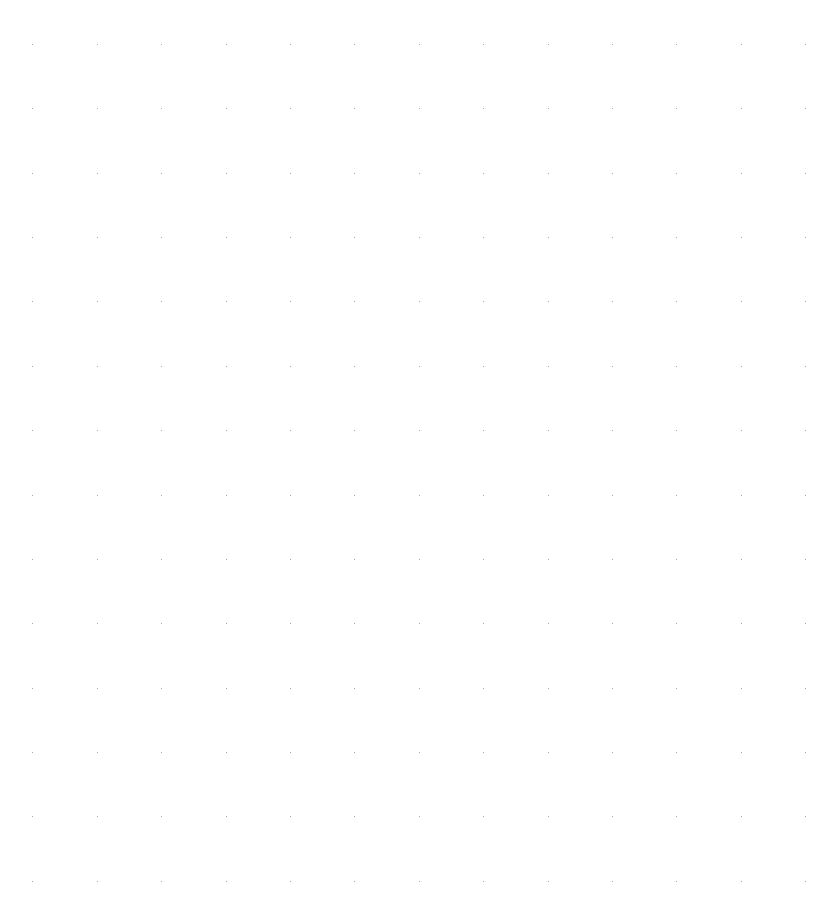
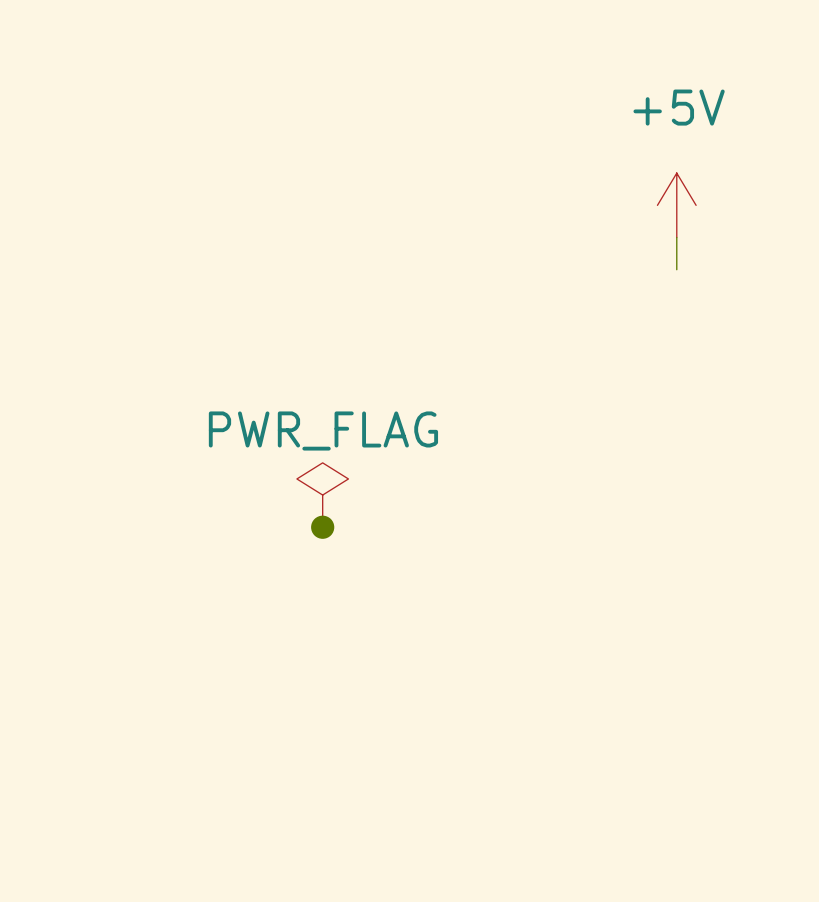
power symbol: none -> +5V (676, 205)
wire: none -> (676, 237) (676, 269)
power symbol: none -> PWR_FLAG (322, 495)
junction: none -> (322, 527)

